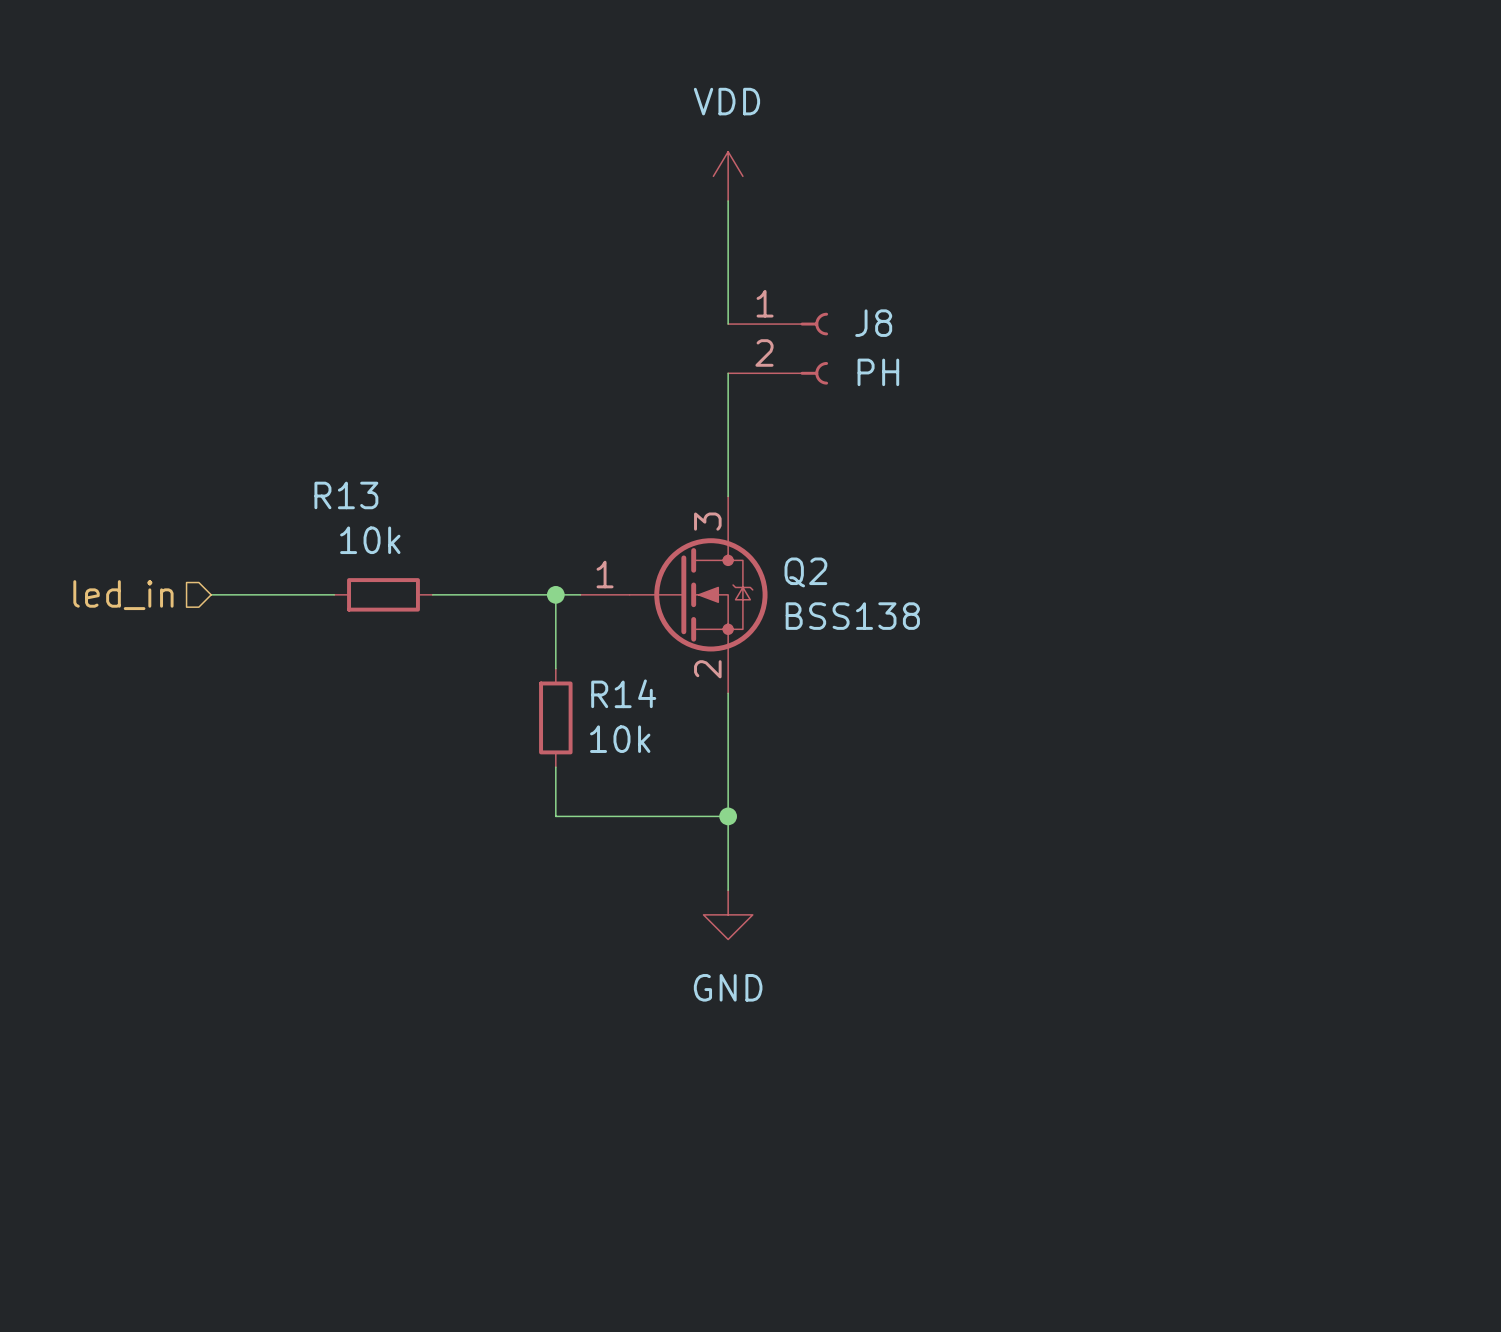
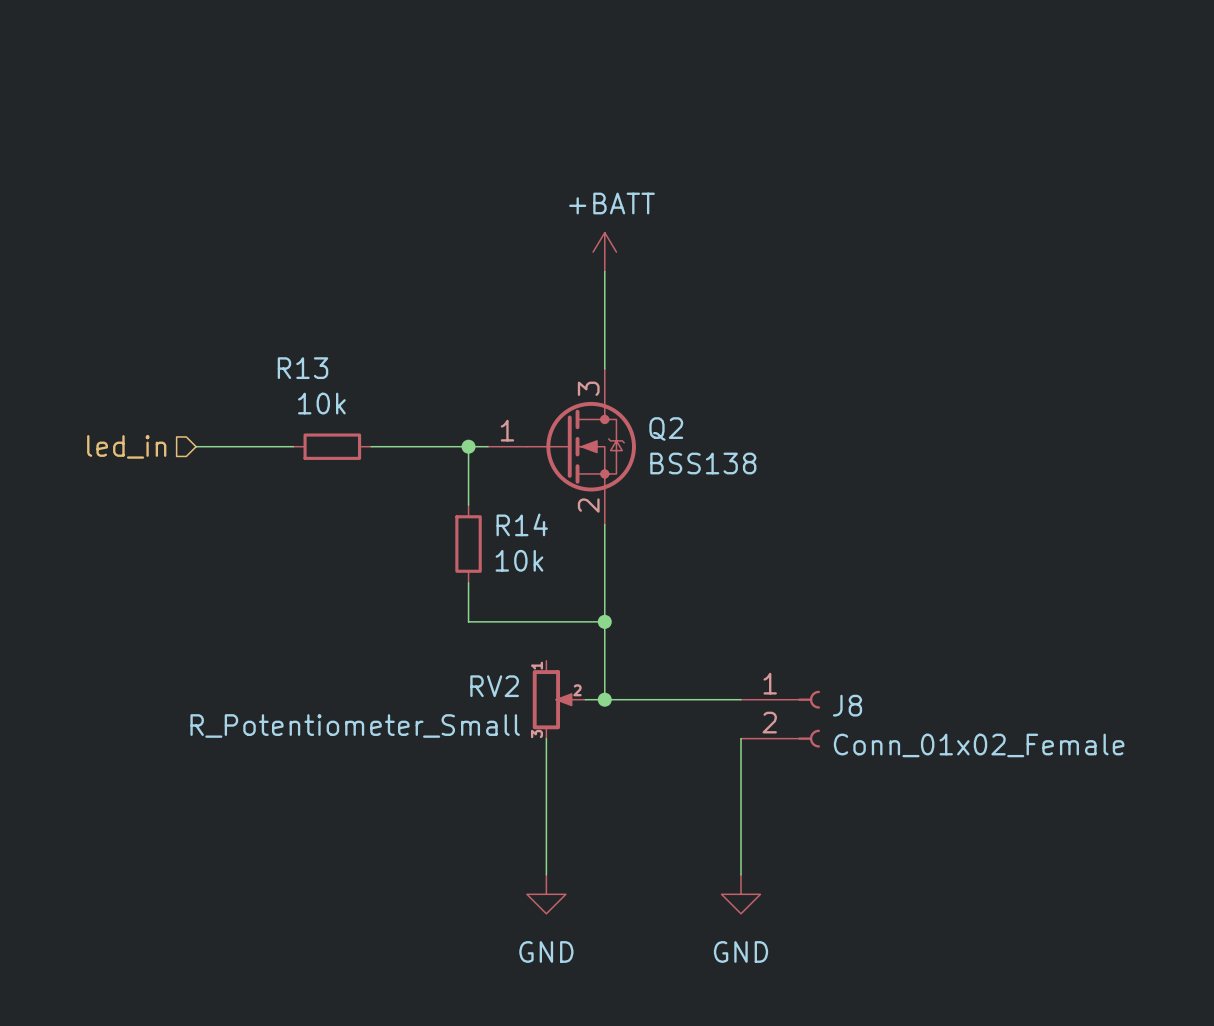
power symbol: VDD (728, 176) -> none
wire: (728, 200) (728, 324) -> none
J8 name position: J8 (873, 323) -> J8 (847, 705)
power symbol: none -> +BATT (604, 252)
J8 position: (778, 348) -> (780, 719)
J8 value: PH (878, 372) -> Conn_01x02_Female (979, 745)
RV2: none -> R_Potentiometer_Small (559, 699)
wire: none -> (585, 699) (741, 699)
power symbol: GND (728, 914) -> none
junction: none -> (604, 699)
wire: none -> (546, 738) (546, 874)
wire: none -> (741, 738) (741, 874)
power symbol: none -> GND (546, 894)
power symbol: none -> GND (741, 894)

